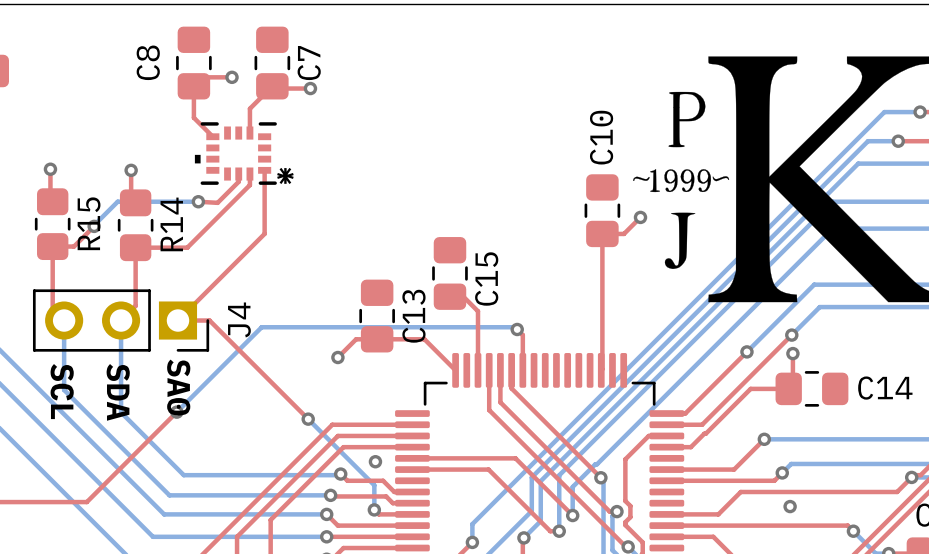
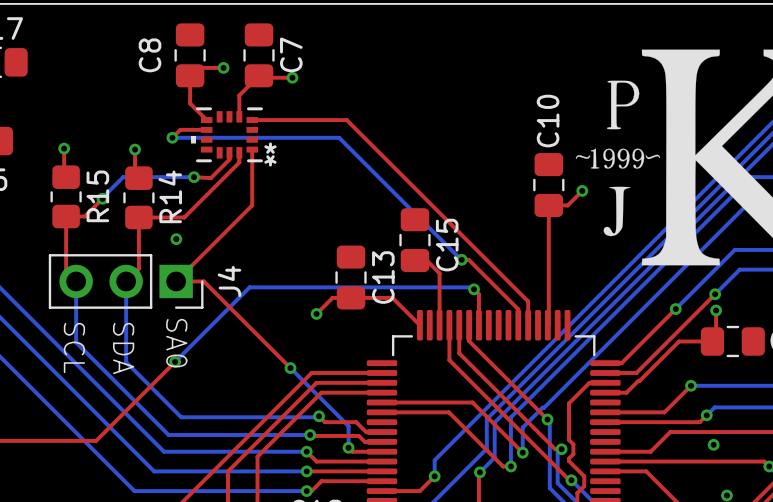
top track: none -> (252, 120) (346, 120) (528, 301) (528, 325)
top track: none -> (206, 129) (180, 129) (172, 137)
bottom track: none -> (172, 137) (339, 137) (461, 259)
via: none -> (172, 137)
via: none -> (176, 239)
top track: none -> (461, 259) (468, 259) (518, 309) (518, 325)
via: none -> (461, 259)
via: (375, 461) -> none

